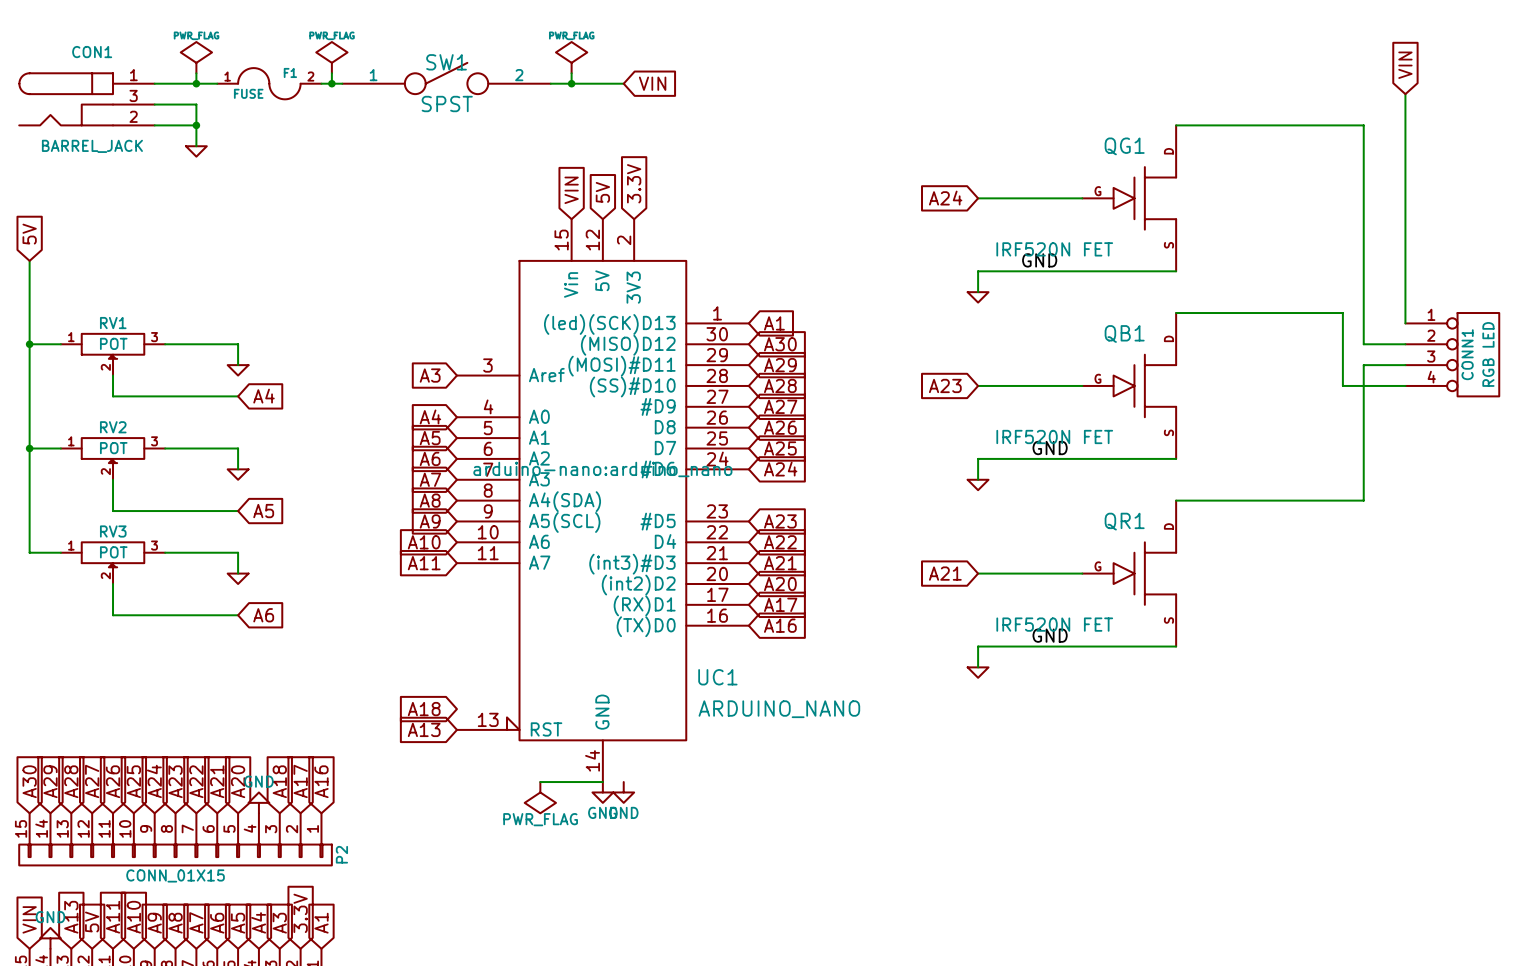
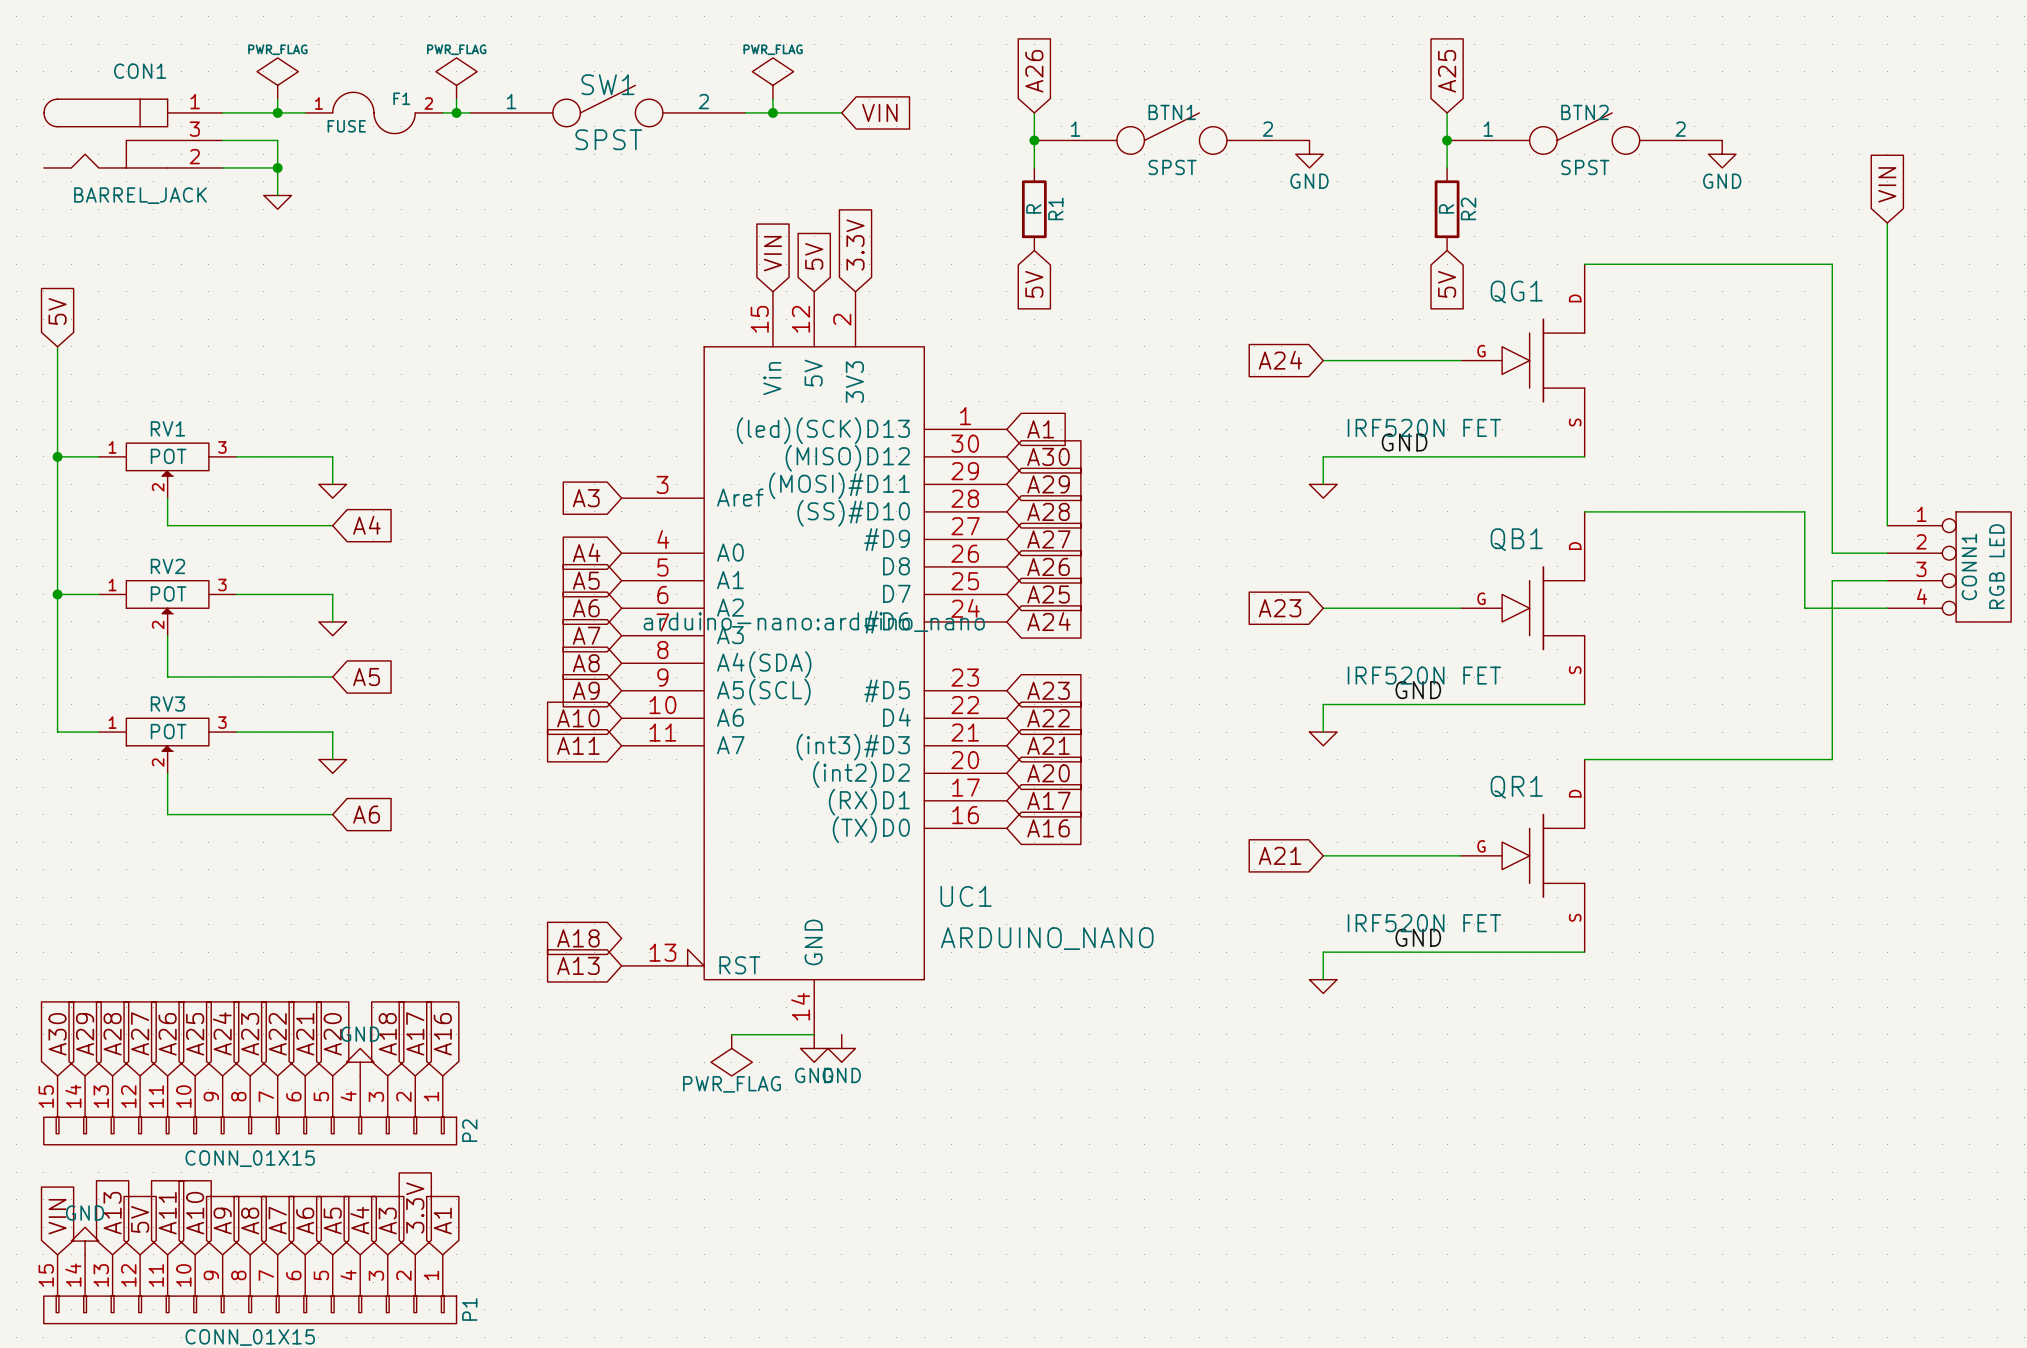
global label: none -> A26 (1034, 71)
global label: none -> A25 (1447, 71)
global label position: VIN (1405, 65) -> VIN (1887, 184)
wire: none -> (1034, 112) (1034, 167)
wire: none -> (1447, 112) (1447, 167)
wire: (1405, 94) (1405, 323) -> (1887, 223) (1887, 525)
BTN1: none -> SPST (1171, 133)
BTN2: none -> SPST (1584, 133)
junction: none -> (1034, 140)
junction: none -> (1447, 140)
power symbol: none -> GND (1309, 154)
power symbol: none -> GND (1722, 154)
wire: (1176, 125) (1363, 125) (1363, 344) (1405, 344) -> (1584, 264) (1832, 264) (1832, 553) (1887, 553)
R1: none -> R (1034, 209)
R2: none -> R (1447, 209)
global label position: A24 (945, 198) -> A24 (1280, 360)
wire: (978, 198) (1082, 198) -> none
QG1 position: (1129, 198) -> (1522, 360)
global label: none -> 5V (1034, 284)
global label: none -> 5V (1447, 284)
label: GND (1039, 260) -> none
wire: (988, 271) (978, 271) (978, 292) -> none
wire: (1092, 271) (1176, 271) -> none
power symbol: (978, 297) -> none
wire: (1176, 313) (1342, 313) (1342, 385) -> (1584, 511) (1791, 511)
label: none -> GND (1404, 442)
wire: none -> (1584, 456) (1323, 456) (1323, 484)
CONN1 position: (1452, 354) -> (1949, 566)
wire: (1405, 365) (1363, 365) (1363, 500) (1176, 500) -> (1887, 580) (1832, 580) (1832, 759) (1584, 759)
power symbol: none -> (1323, 491)
global label position: A23 (945, 385) -> A23 (1280, 608)
wire: (978, 385) (1082, 385) -> none
QB1 position: (1129, 385) -> (1522, 608)
wire: (1353, 385) (1405, 385) -> (1804, 511) (1804, 608) (1887, 608)
label: GND (1050, 448) -> none
wire: (988, 458) (978, 458) (978, 479) -> none
wire: (1092, 458) (1176, 458) -> none
power symbol: (978, 484) -> none
label: none -> GND (1418, 690)
wire: none -> (1584, 704) (1323, 704) (1323, 732)
power symbol: none -> (1323, 738)
global label position: A21 (945, 573) -> A21 (1280, 855)
wire: (978, 573) (1082, 573) -> none
QR1 position: (1129, 573) -> (1522, 855)
label: GND (1050, 635) -> none
wire: (988, 646) (978, 646) (978, 667) -> none
wire: (1092, 646) (1176, 646) -> none
power symbol: (978, 672) -> none
label: none -> GND (1418, 937)
wire: none -> (1584, 952) (1323, 952) (1323, 979)
power symbol: none -> (1323, 986)

